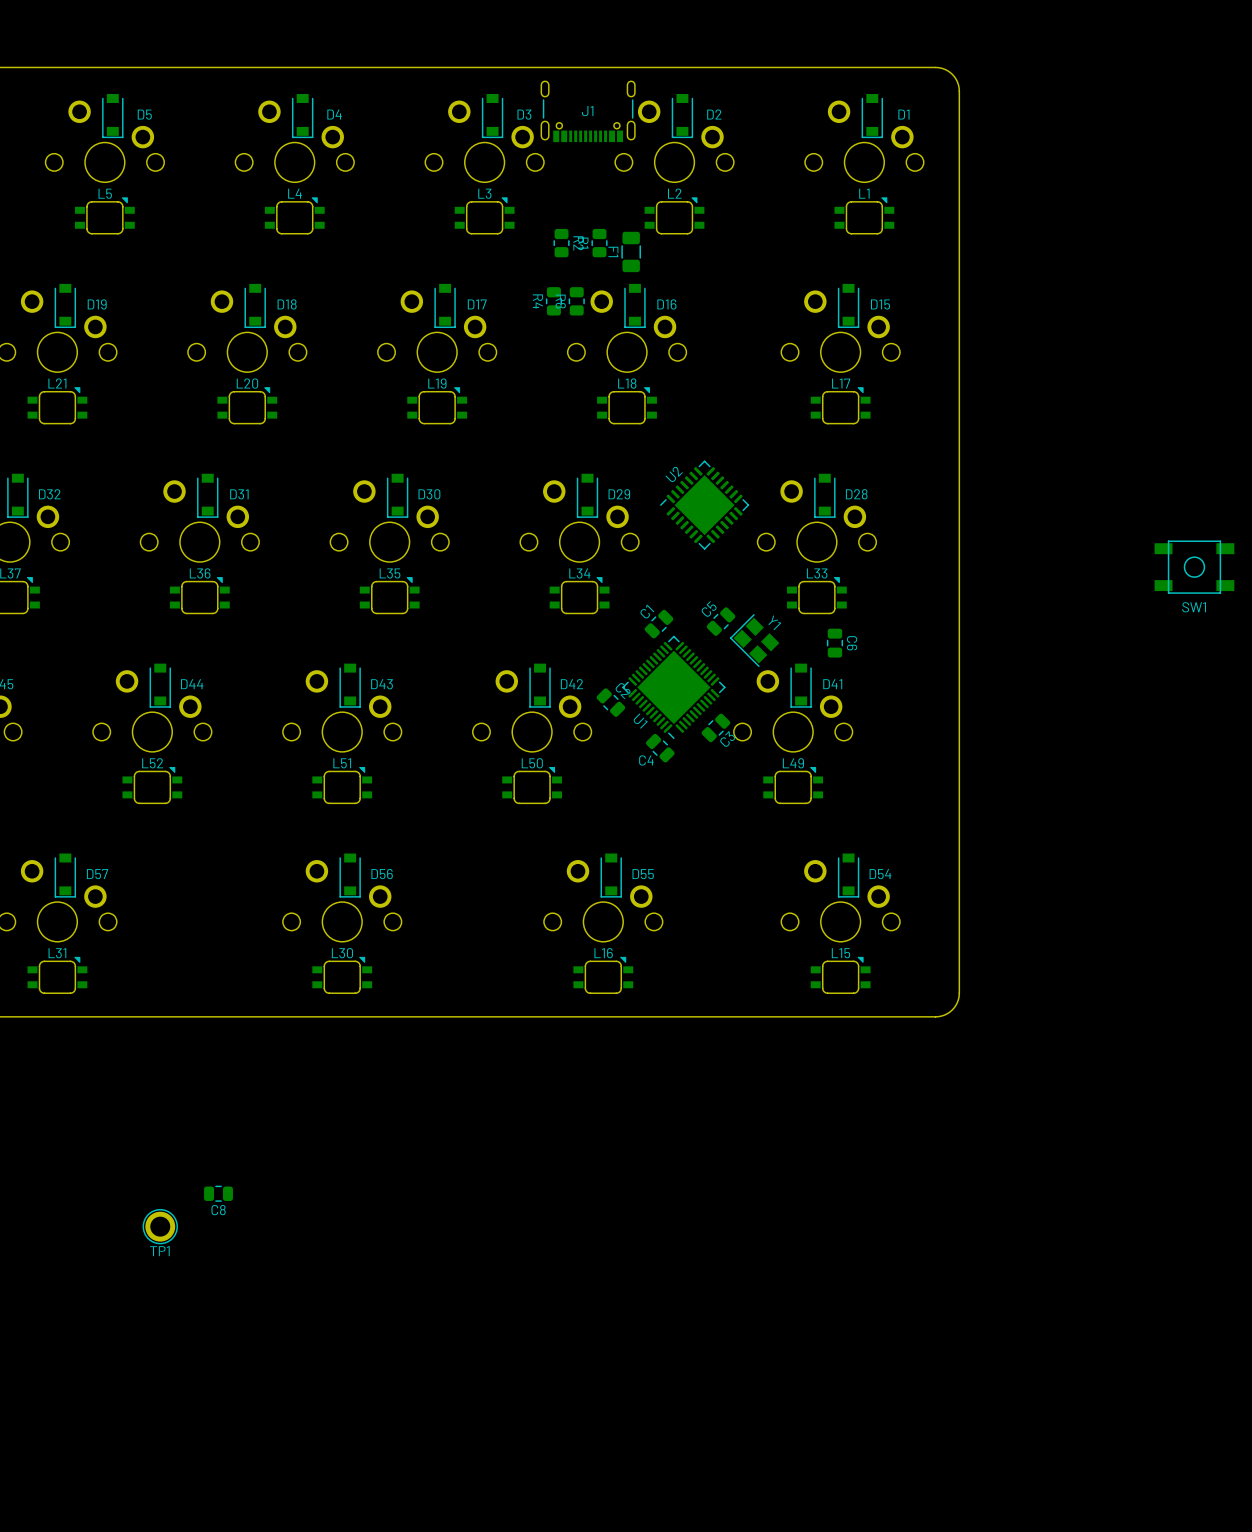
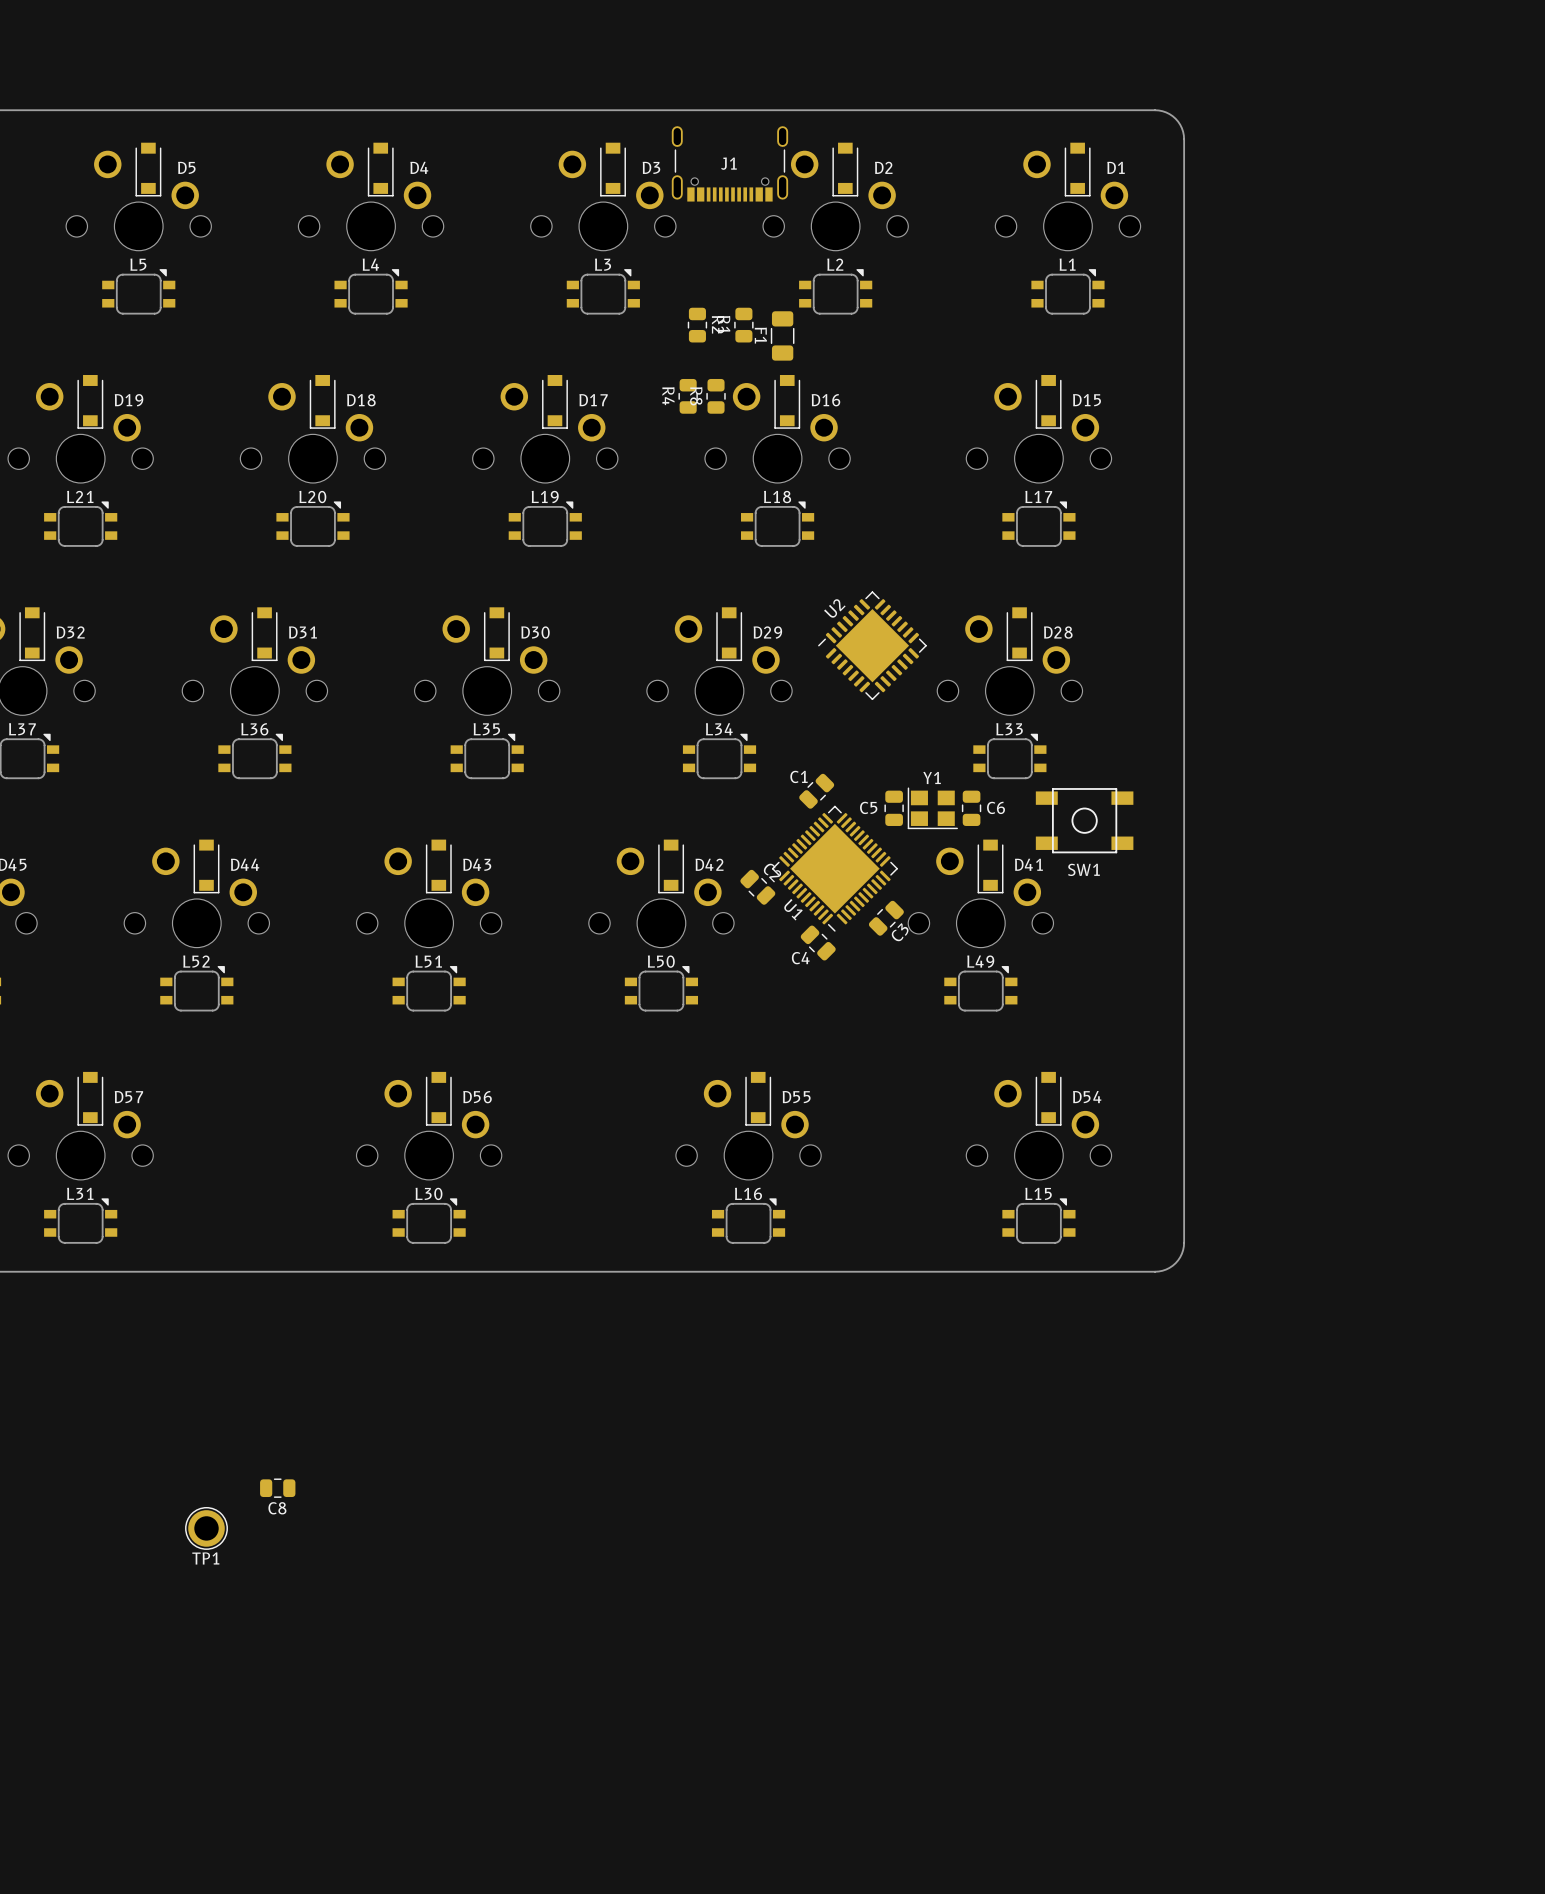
SW1 position: (1194, 567) -> (1084, 820)
C1 name rotation: 0° (647, 611) -> 45° clockwise (799, 776)
C5 rotation: 0° (721, 621) -> 45° counterclockwise (894, 808)
Y1 rotation: 0° (754, 640) -> 45° counterclockwise (932, 808)
C6 position: (834, 643) -> (971, 808)
C6 name rotation: 0° (852, 643) -> 90° counterclockwise (996, 807)

